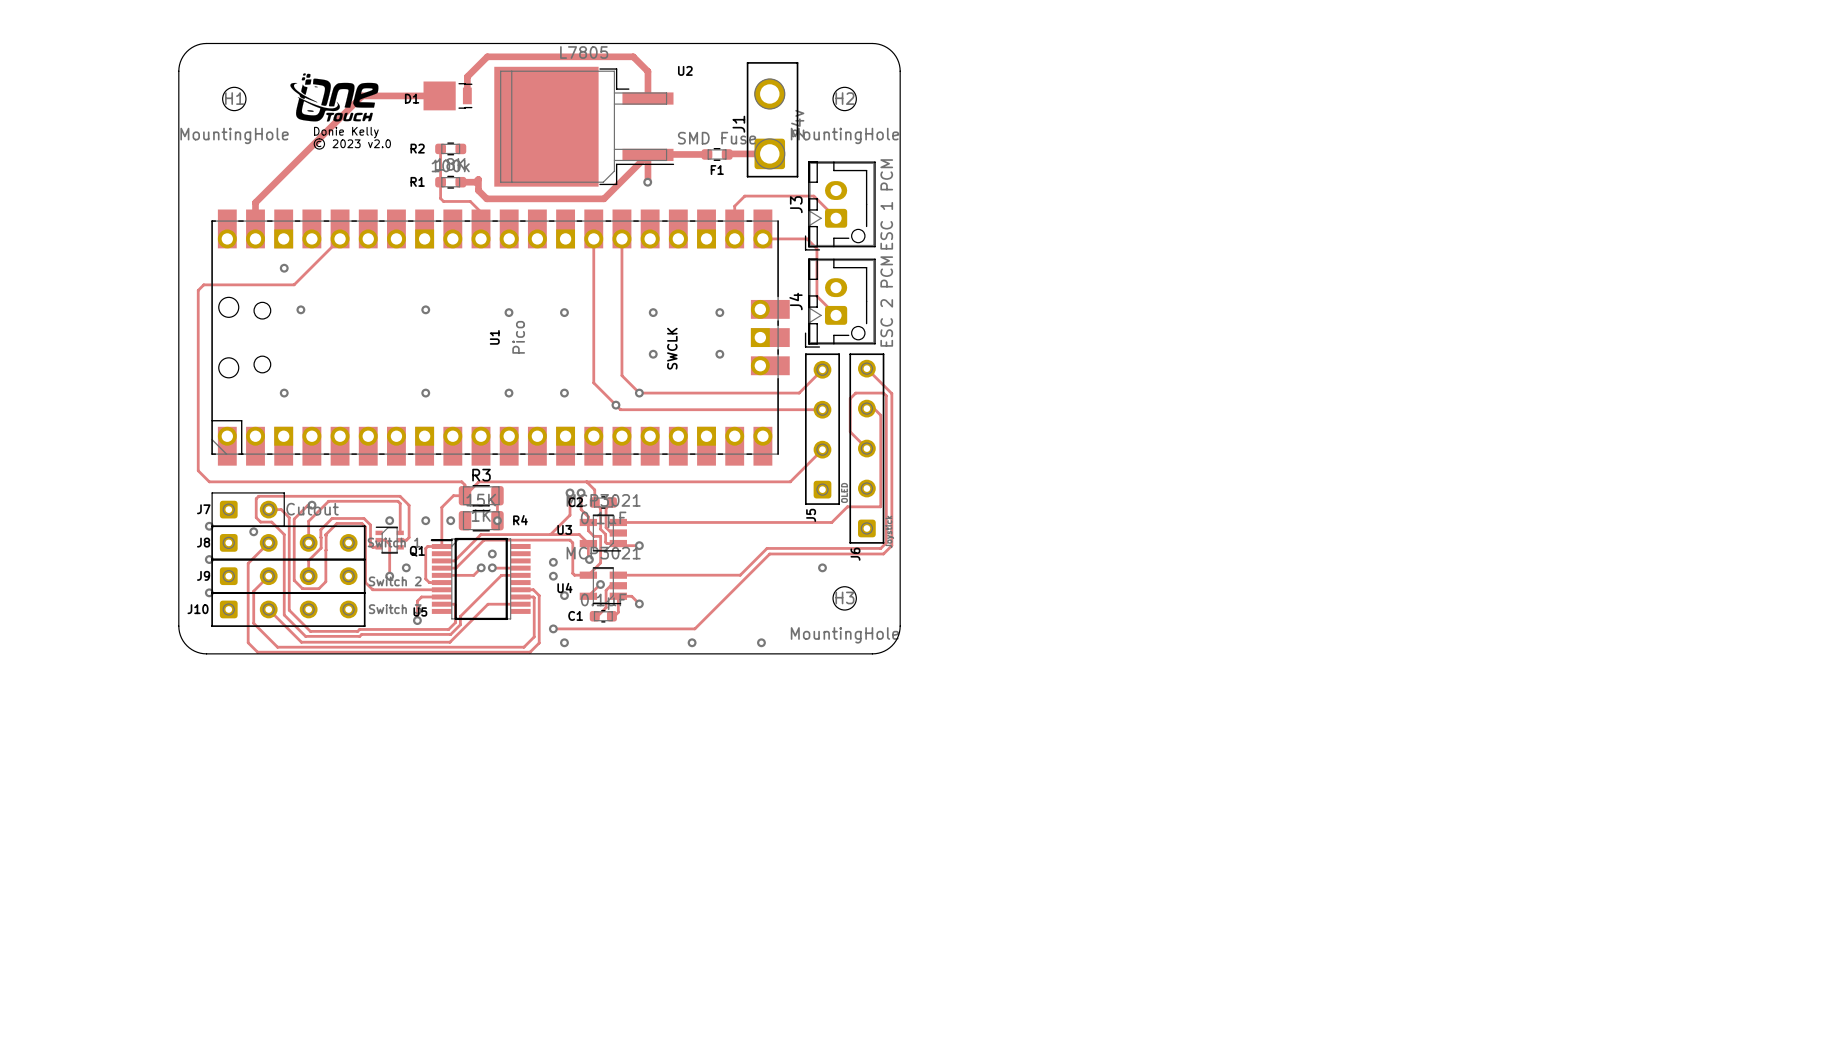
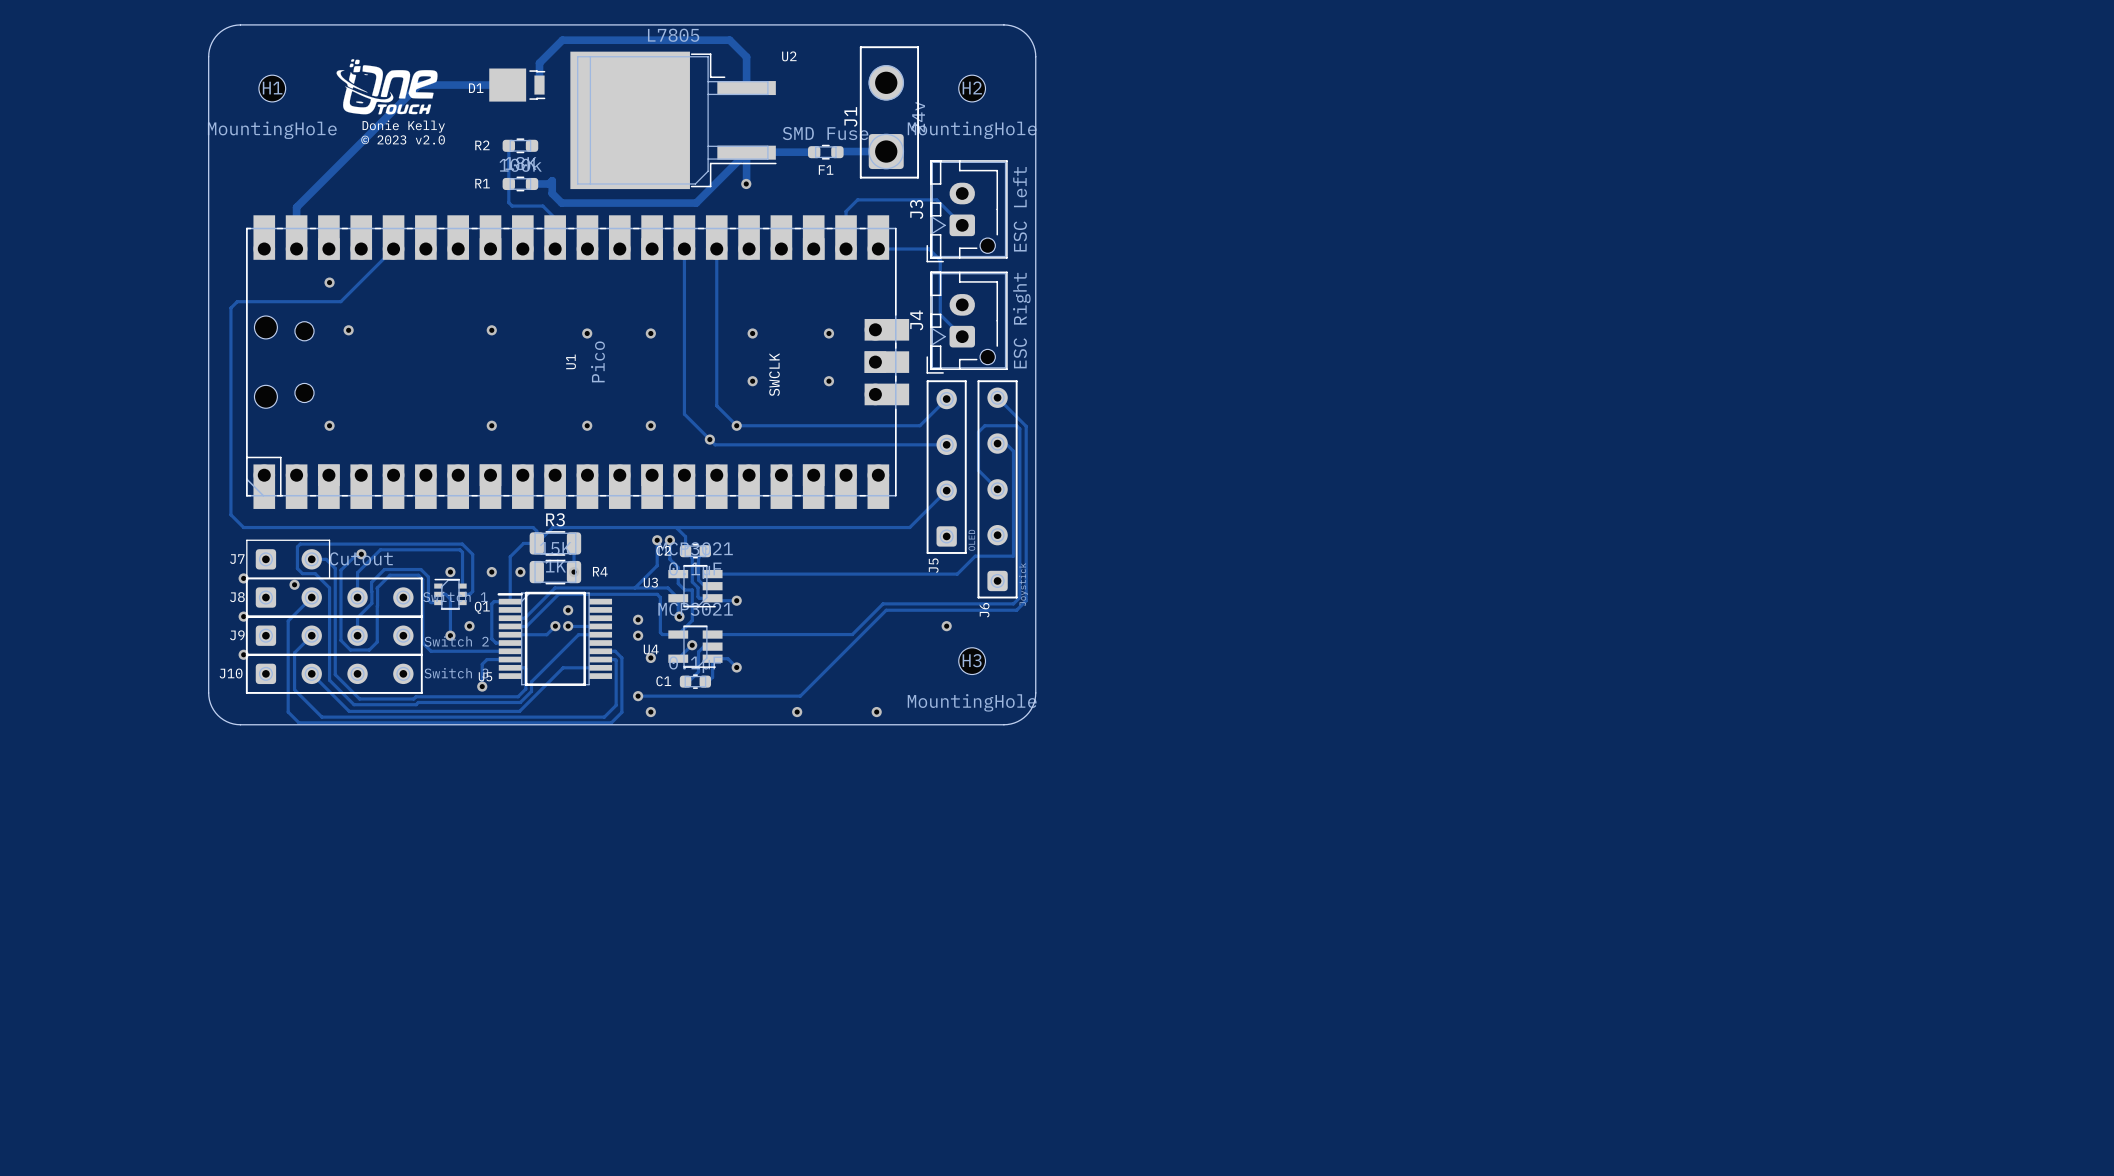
J3 value: ESC 1 PCM (886, 204) -> ESC Left (1020, 209)
J4 value: ESC 2 PCM (886, 301) -> ESC Right (1021, 320)

